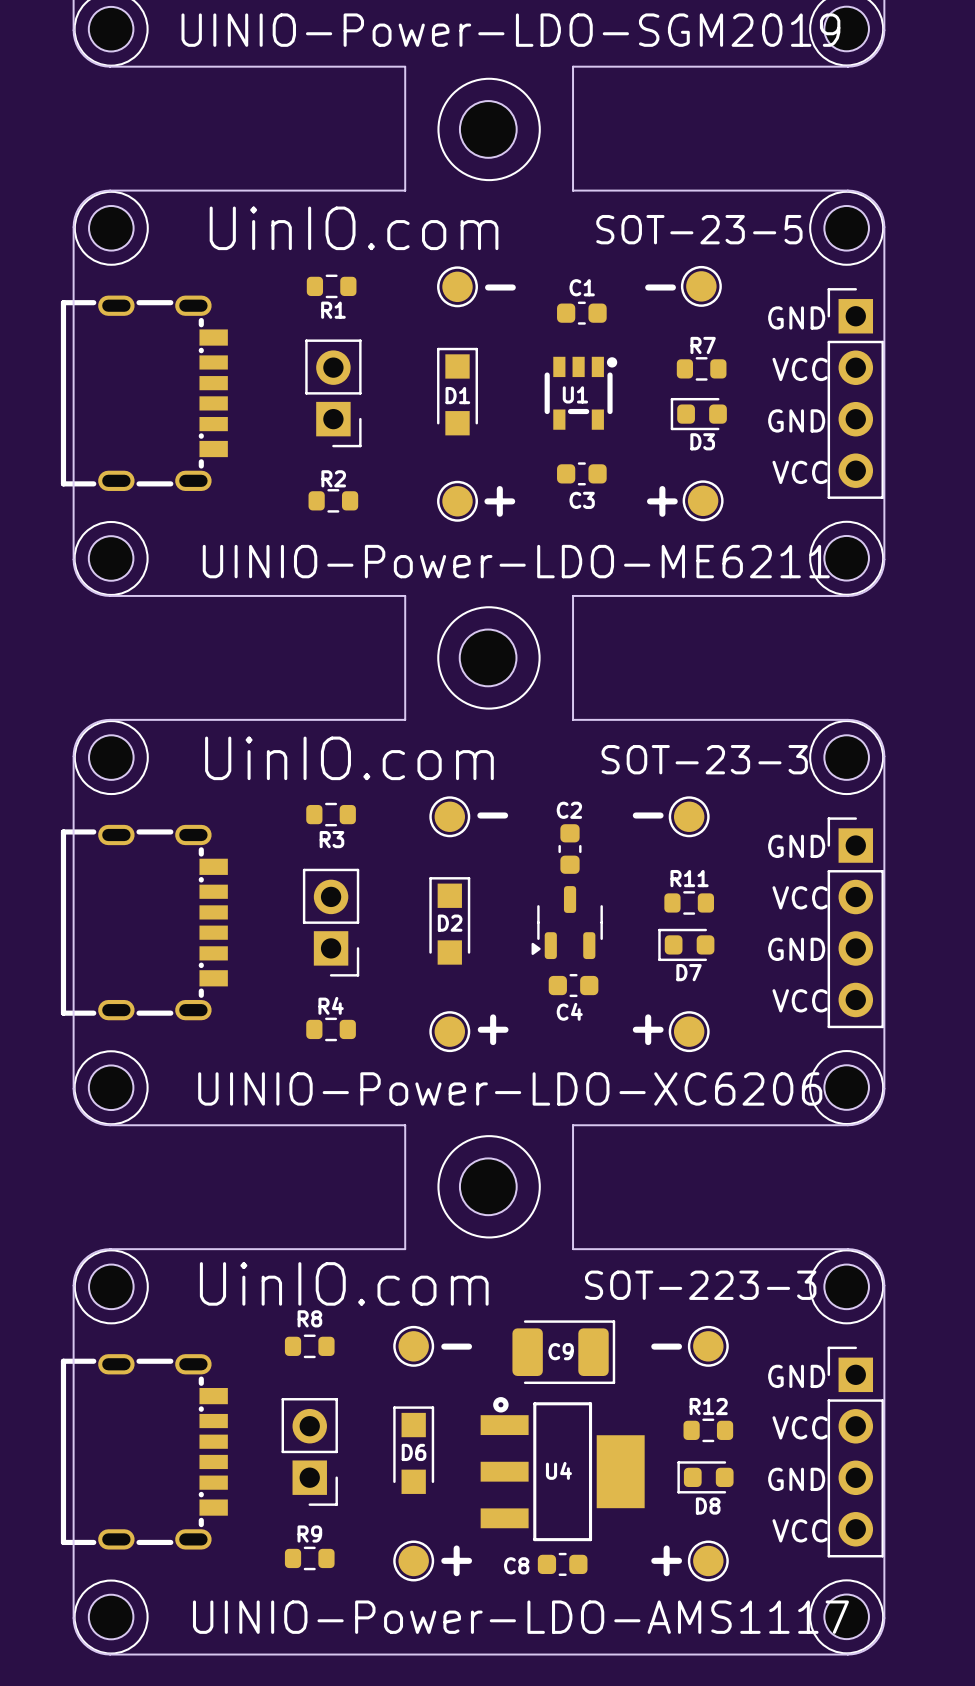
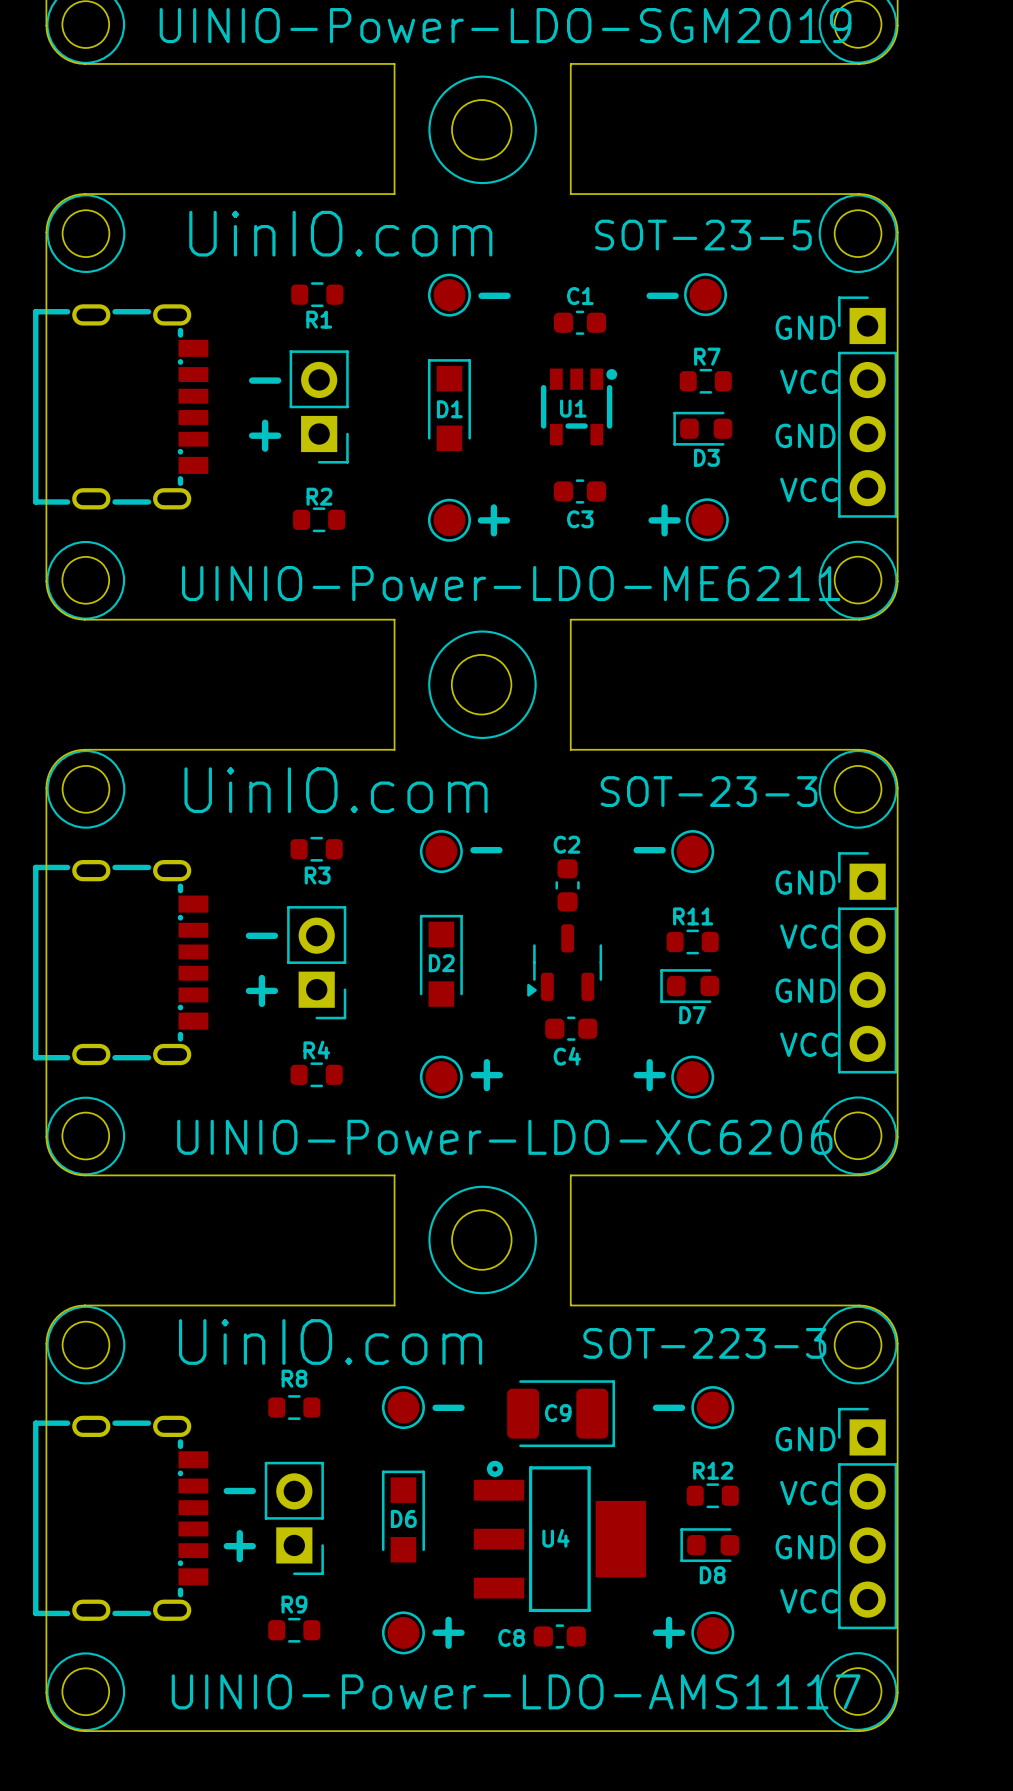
text: none -> - (265, 380)
text: none -> + (265, 435)
text: none -> - (261, 935)
text: none -> + (261, 990)
text: none -> - (239, 1491)
text: none -> + (239, 1546)

